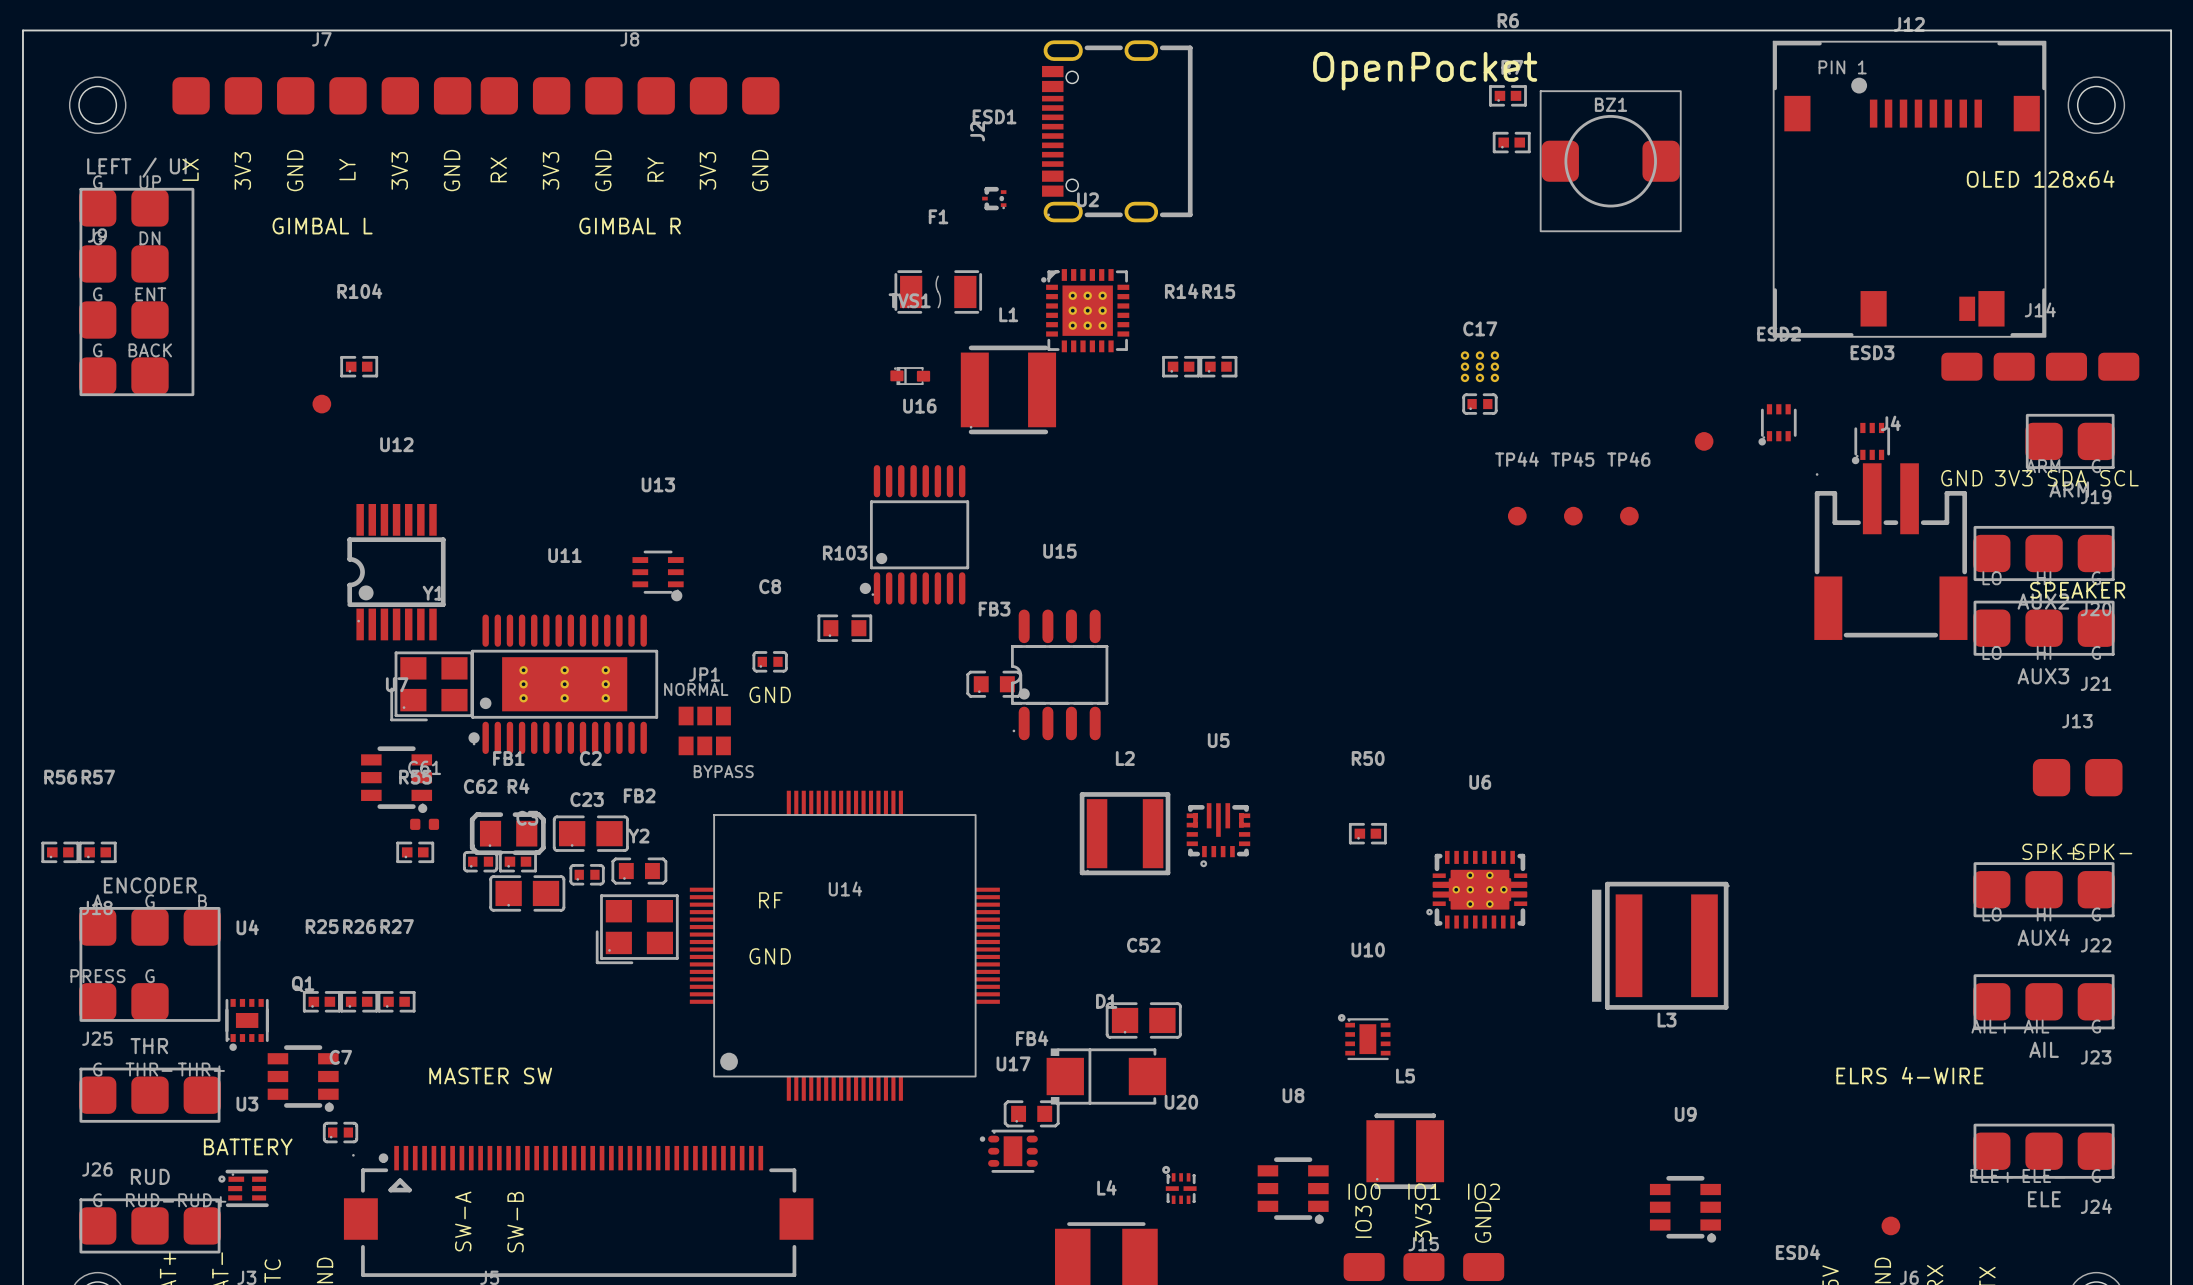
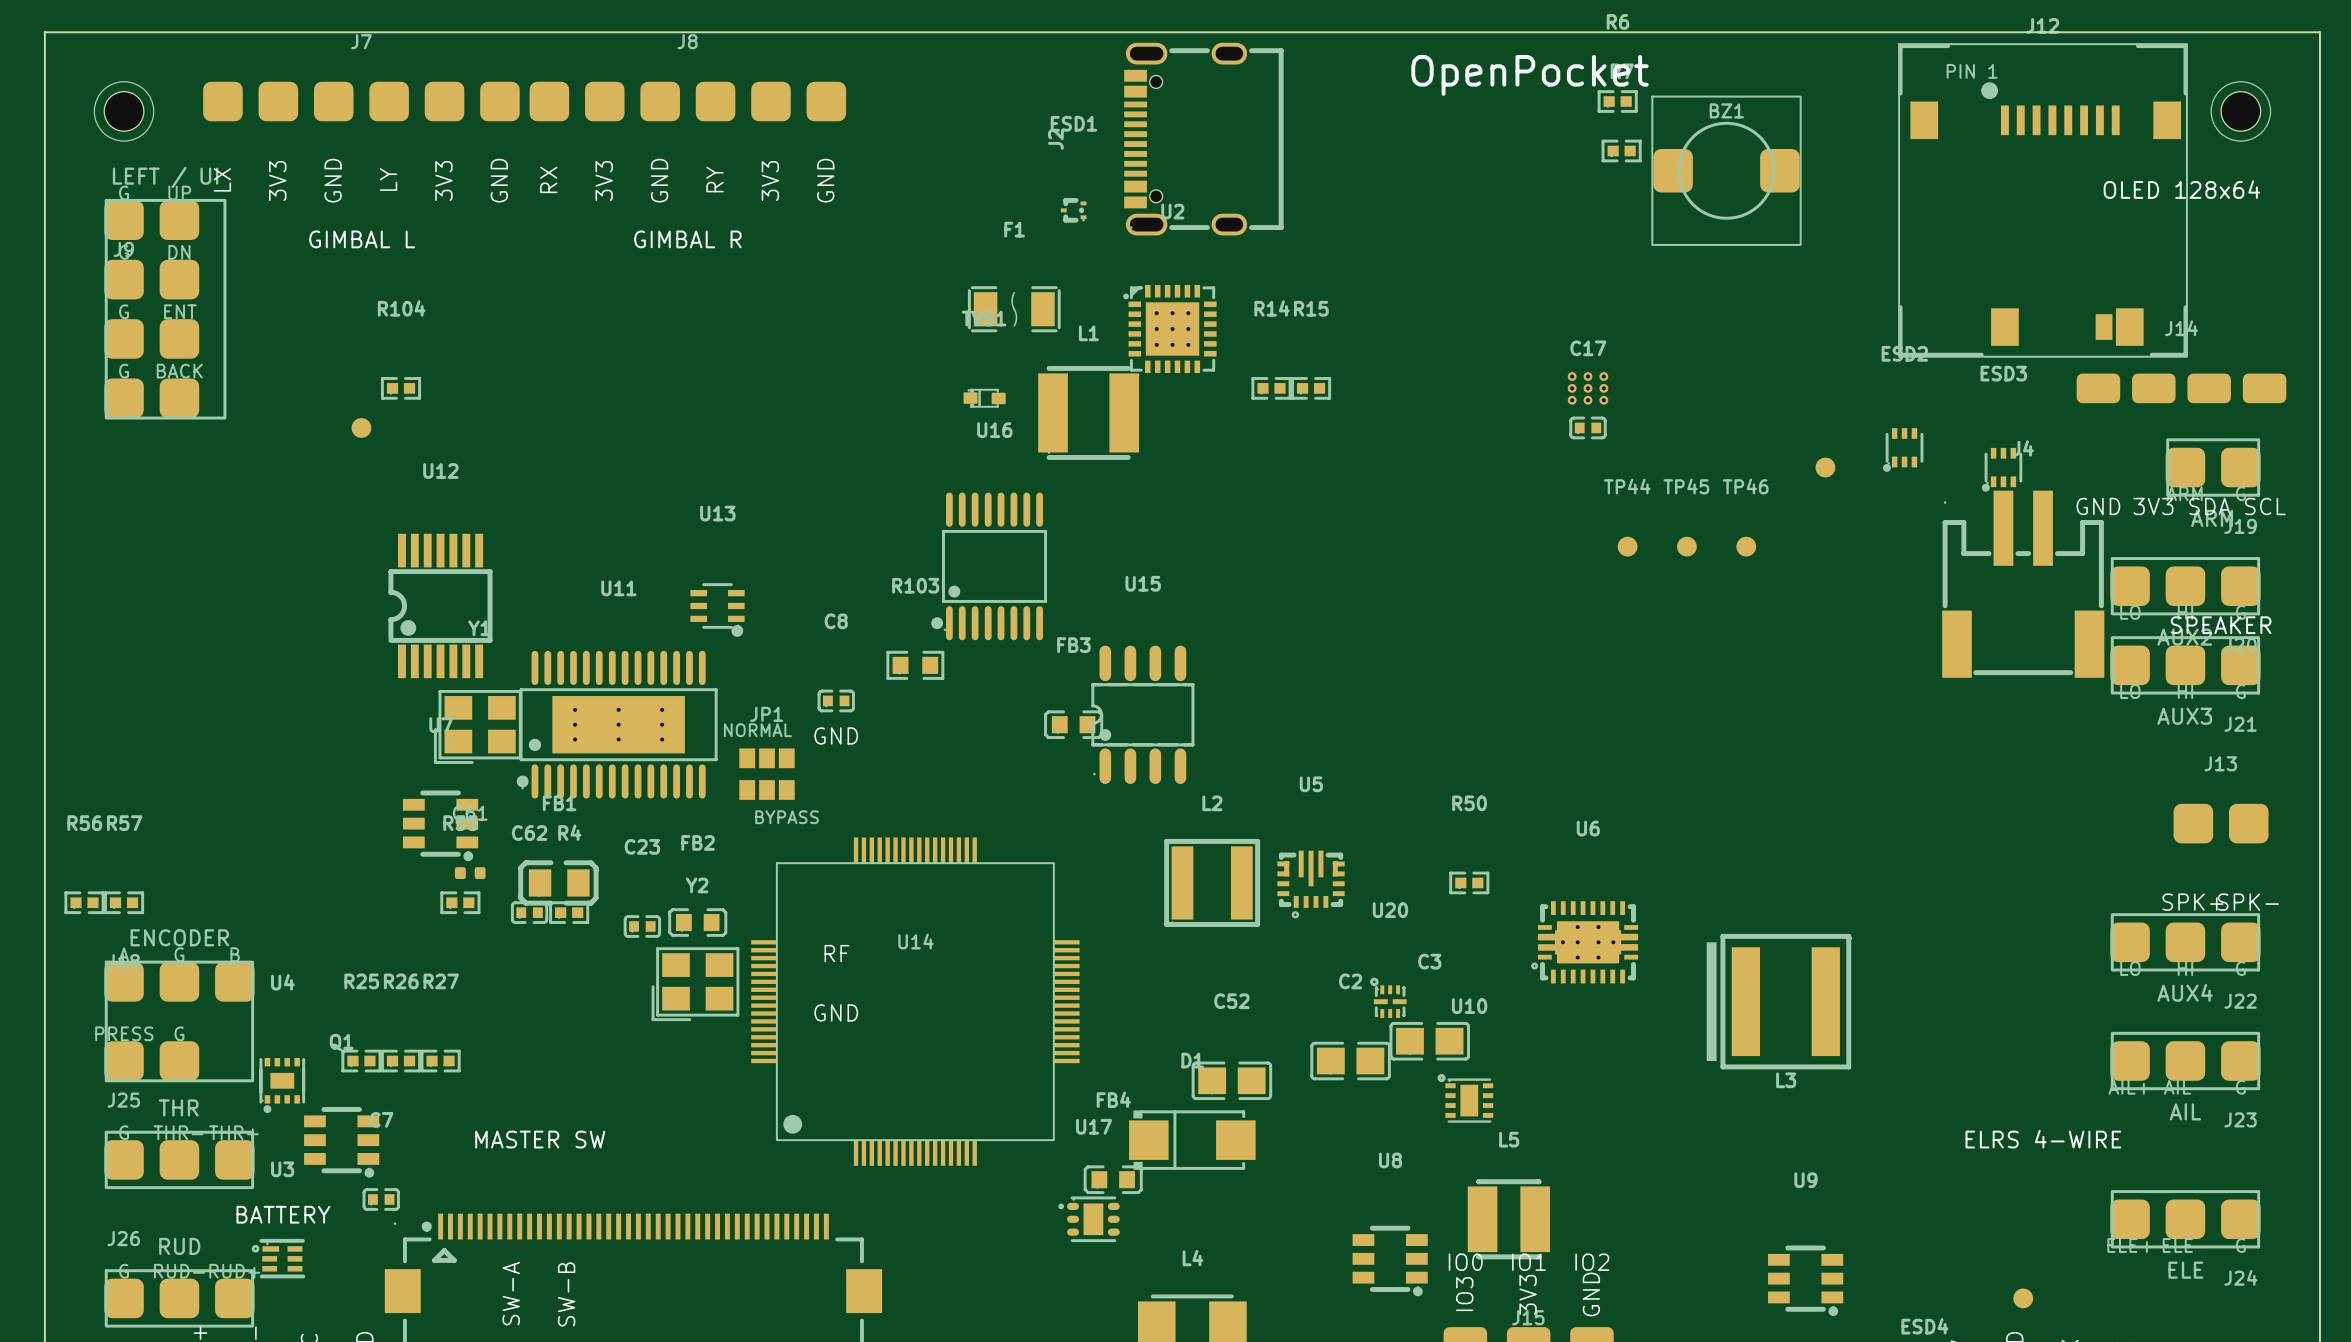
C2 position: (590, 833) -> (1350, 1061)
C3 position: (527, 893) -> (1429, 1041)
U20 position: (1179, 1184) -> (1388, 997)

